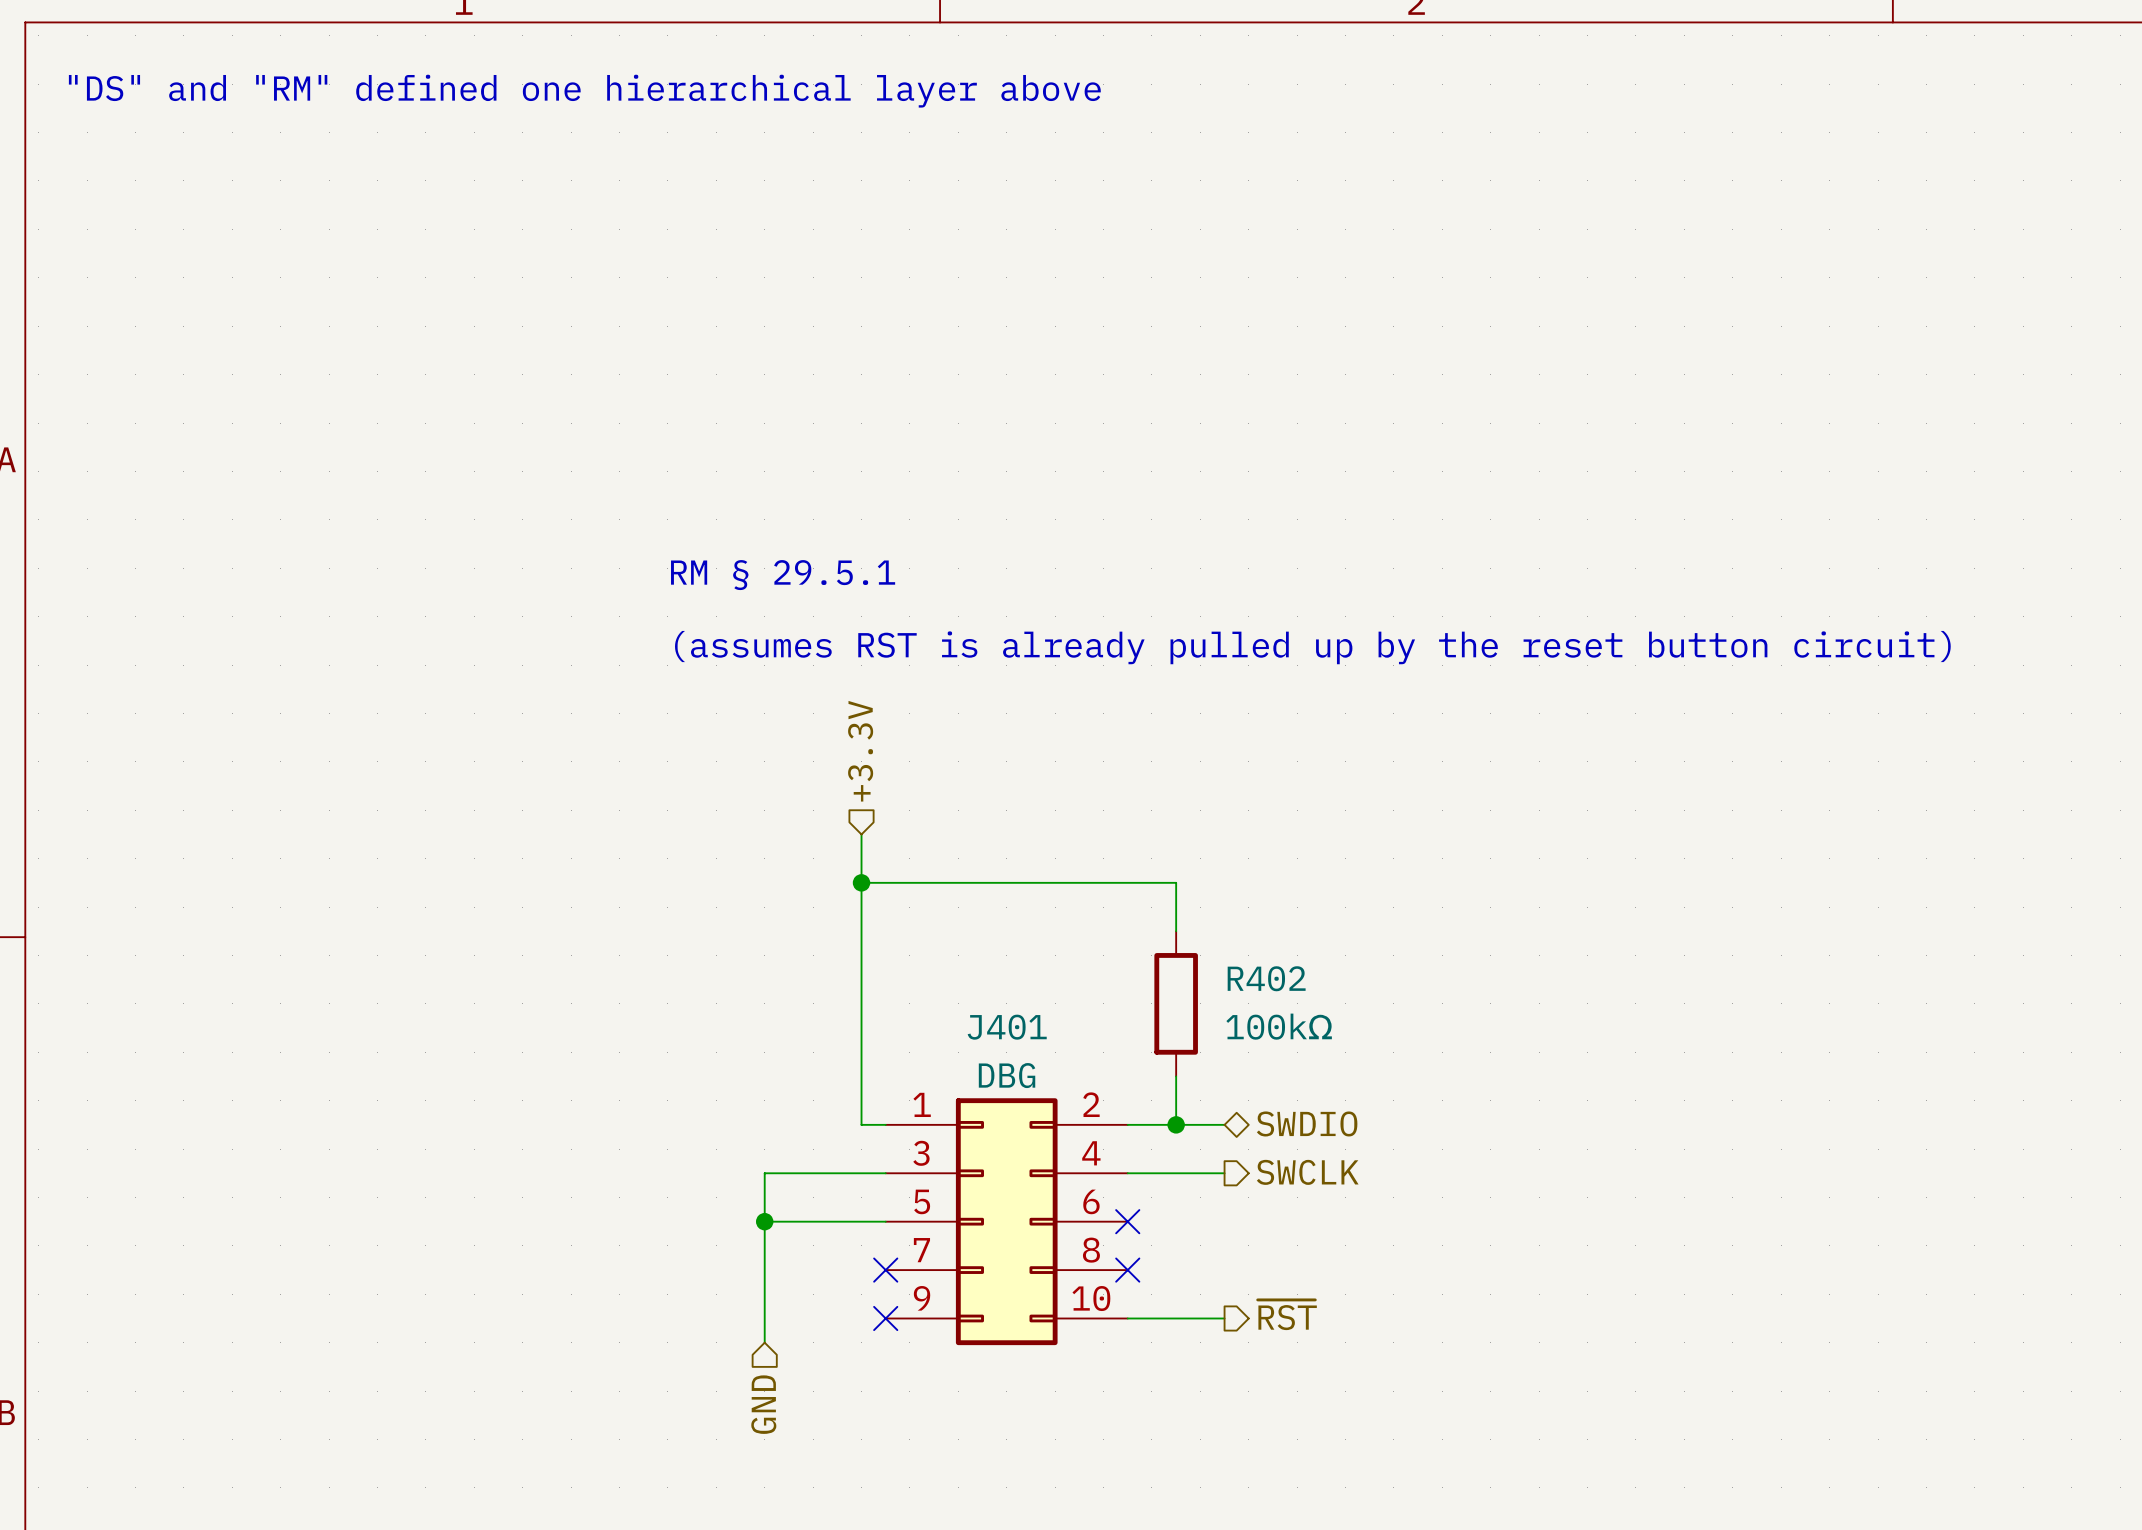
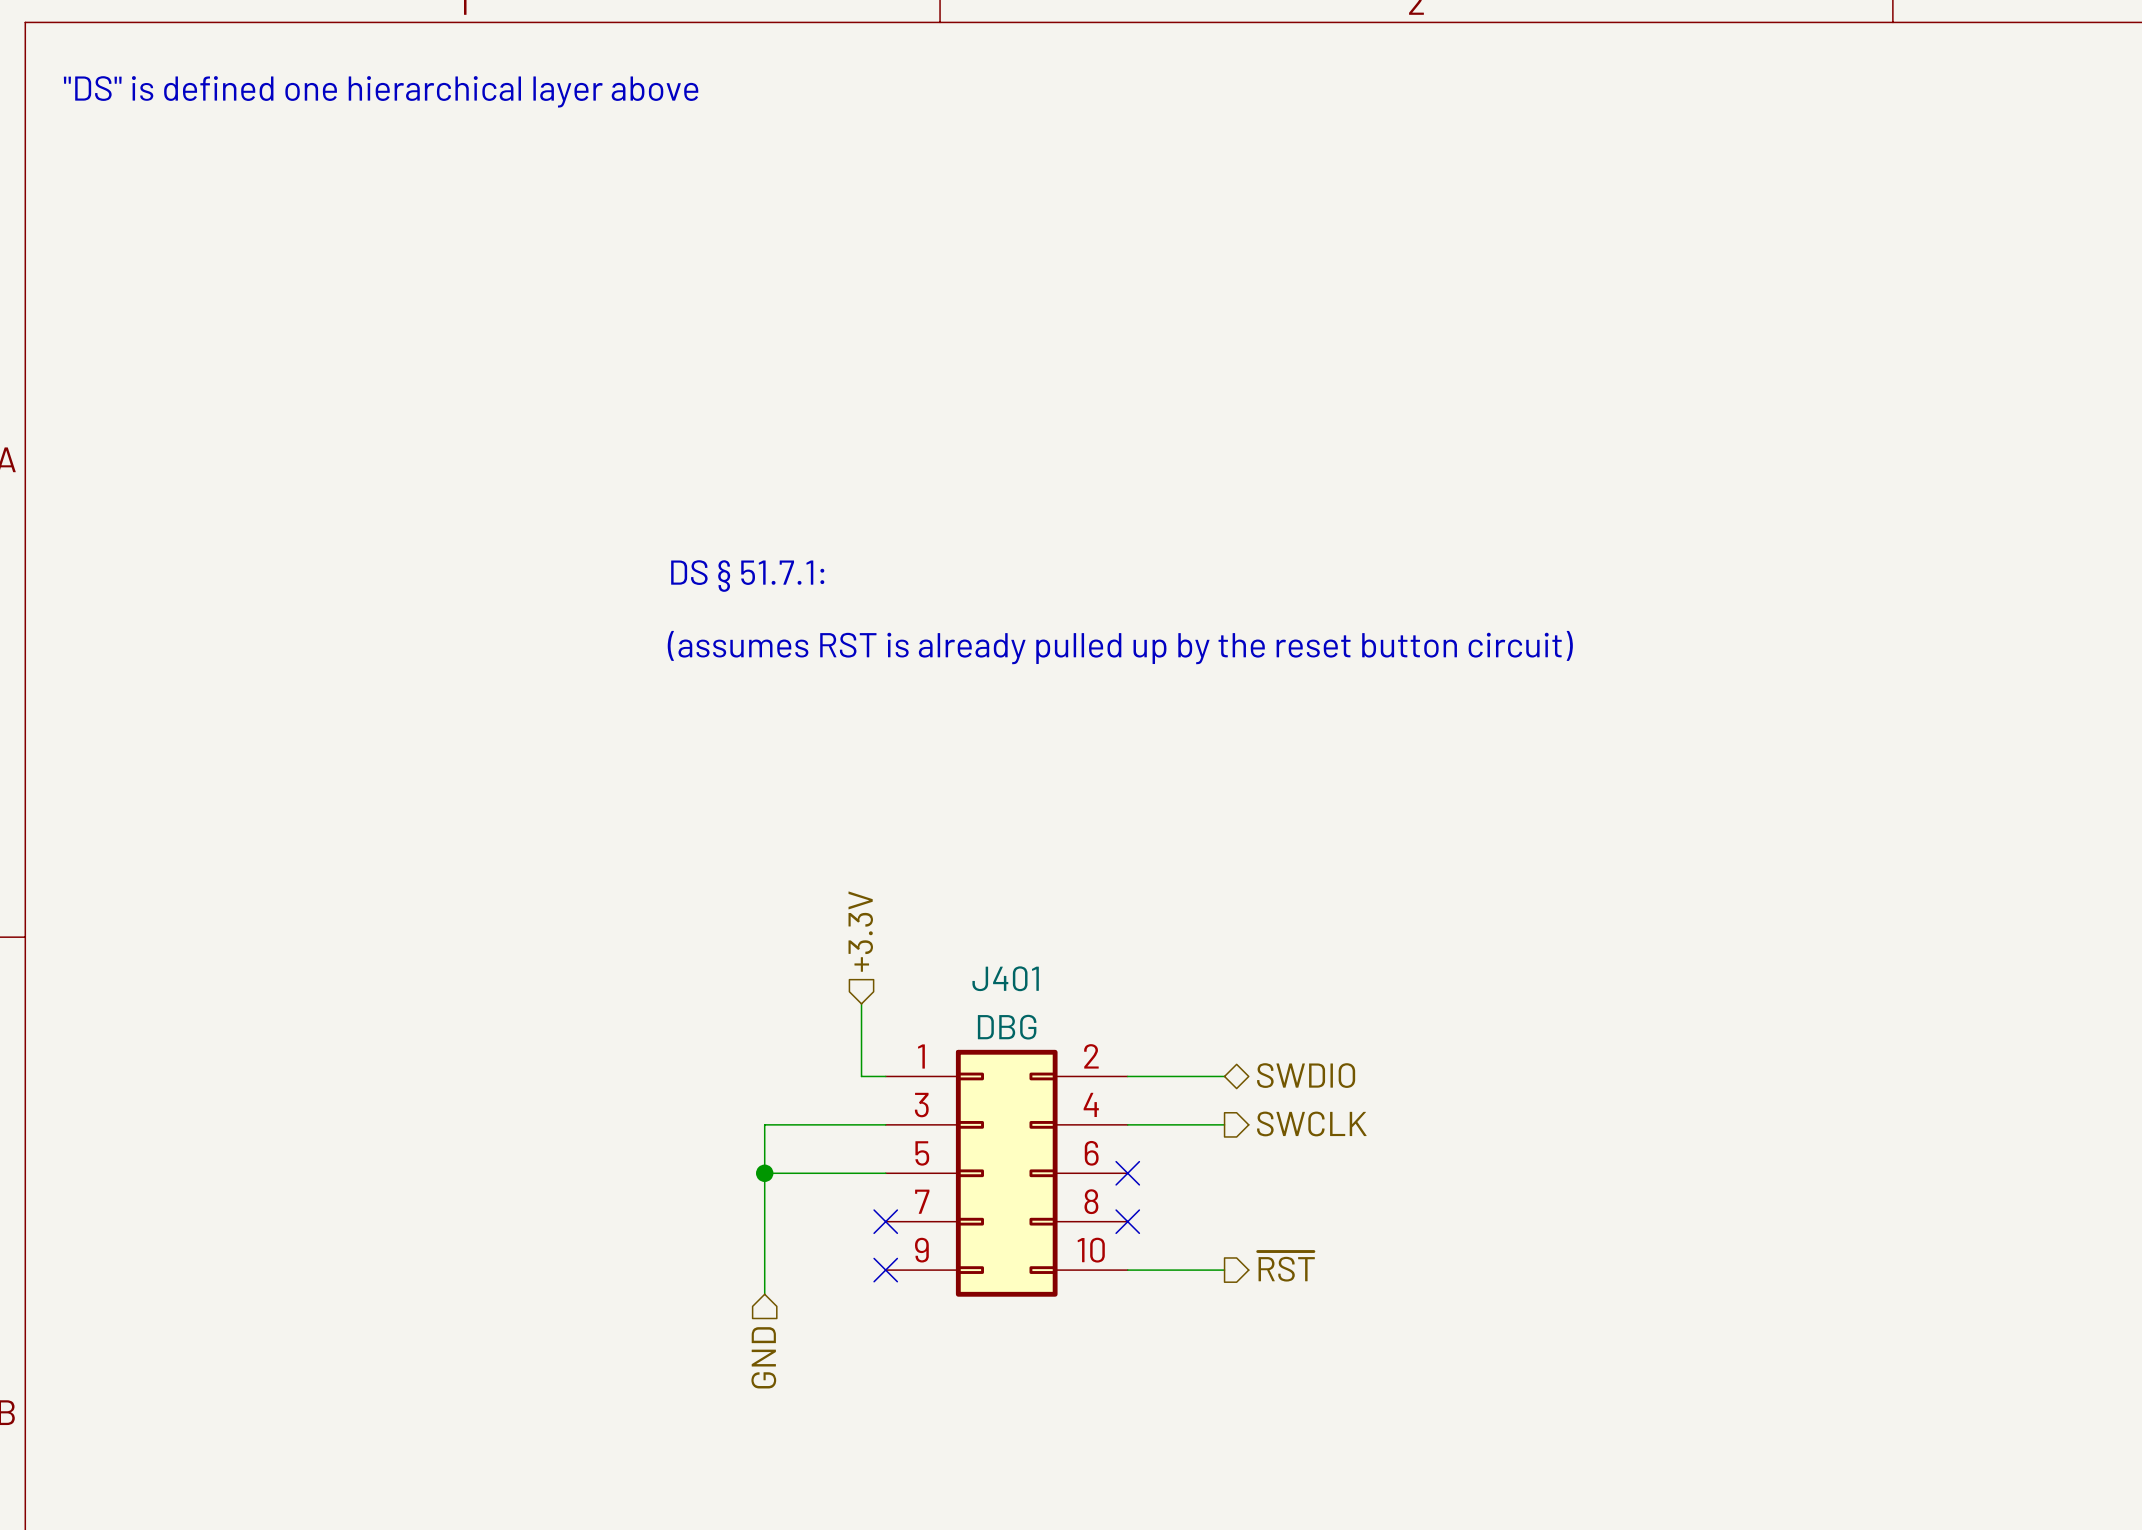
text: "DS" and "RM" defined one hierarchical layer above (584, 91) -> "DS" is defined one hierarchical layer above (381, 91)
text: RM § 29.5.1 (783, 575) -> DS § 51.7.1: (747, 576)
hierarchical label position: +3.3V (860, 751) -> +3.3V (860, 931)
wire: (861, 834) (861, 1003) -> none
wire: (861, 882) (1176, 882) (1176, 931) -> none
junction: (861, 882) -> none
R402: 100kΩ (1176, 1003) -> none
hierarchical label: none -> SWDIO (1306, 1075)
wire: (861, 1076) (861, 1124) -> (861, 1076) (885, 1076)
wire: (1176, 1076) (1176, 1124) -> none
hierarchical label shape: bidirectional (1307, 1123) -> output (1311, 1123)
hierarchical label: SWDIO (1307, 1123) -> SWCLK (1311, 1123)
wire: none -> (861, 1124) (764, 1124) (764, 1173)
junction: (1176, 1124) -> none
hierarchical label: SWCLK (1307, 1172) -> none
wire: (1127, 1173) (1224, 1173) -> (1127, 1076) (1224, 1076)
wire: (764, 1221) (885, 1221) -> none
junction position: (764, 1221) -> (764, 1173)
J401 position: (1006, 1221) -> (1006, 1173)
no-connect mark position: (1127, 1270) -> (1127, 1173)
wire: (764, 1294) (764, 1342) -> none
hierarchical label position: ~{RST} (1287, 1315) -> ~{RST} (1286, 1266)
no-connect mark position: (885, 1318) -> (885, 1221)
wire: (1127, 1318) (1224, 1318) -> (1127, 1270) (1224, 1270)
hierarchical label position: GND (763, 1404) -> GND (763, 1357)

